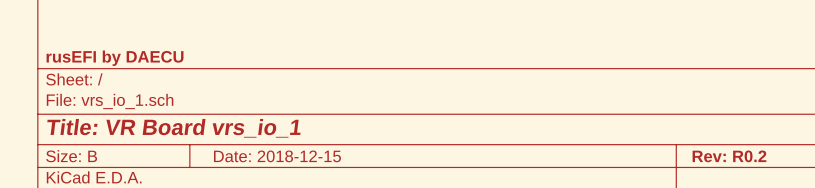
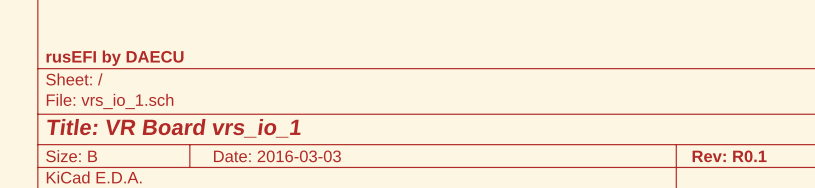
title block: Date: 2018-12-15 (277, 156) -> Date: 2016-03-03 (277, 156)
title block: Rev: R0.2 (729, 156) -> Rev: R0.1 (729, 156)

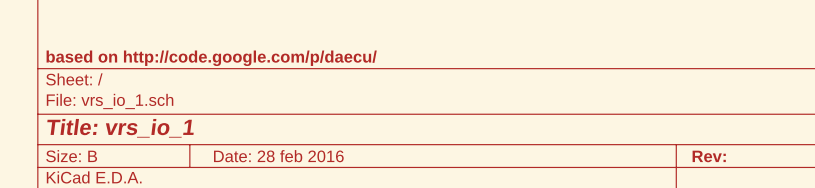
title block: rusEFI by DAECU (115, 58) -> based on http://code.google.com/p/daecu/ (211, 58)
title block: Title: VR Board vrs_io_1 (173, 128) -> Title: vrs_io_1 (120, 128)
title block: Date: 2016-03-03 (277, 156) -> Date: 28 feb 2016 (278, 156)
title block: Rev: R0.1 (729, 156) -> Rev: (709, 156)

